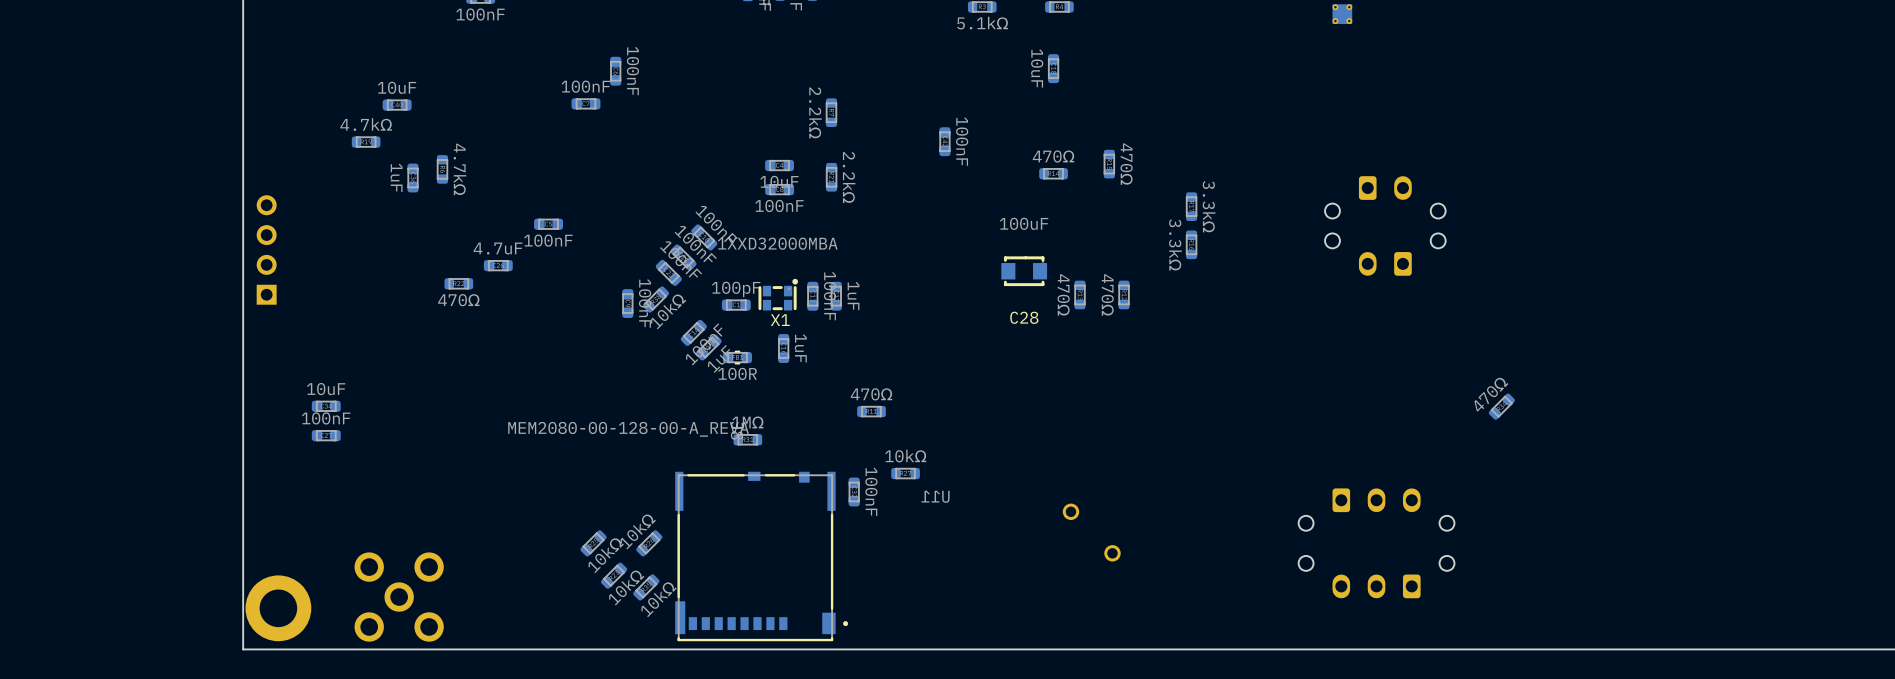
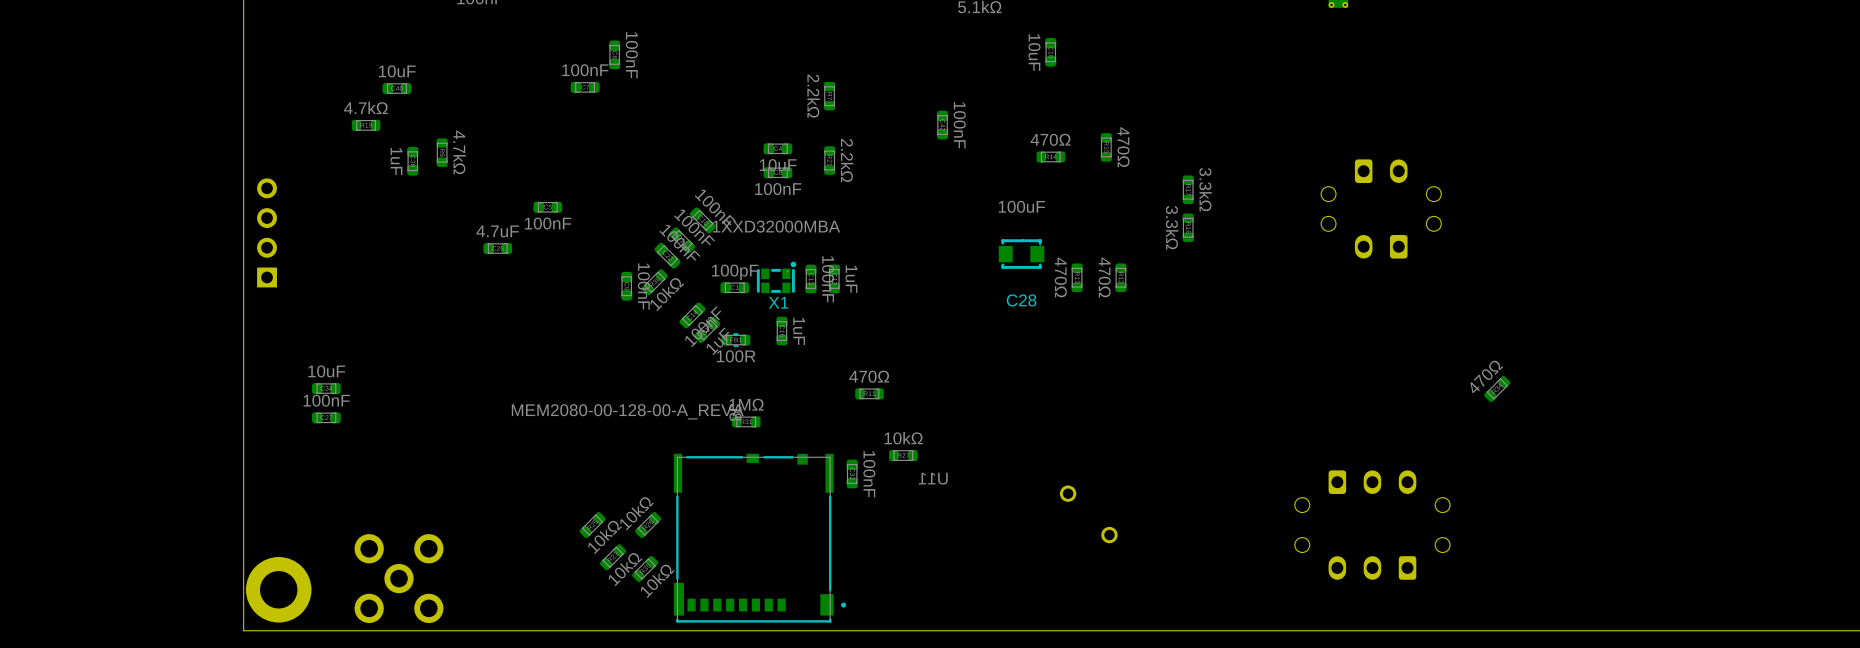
part: 470Ω (458, 283) -> none

